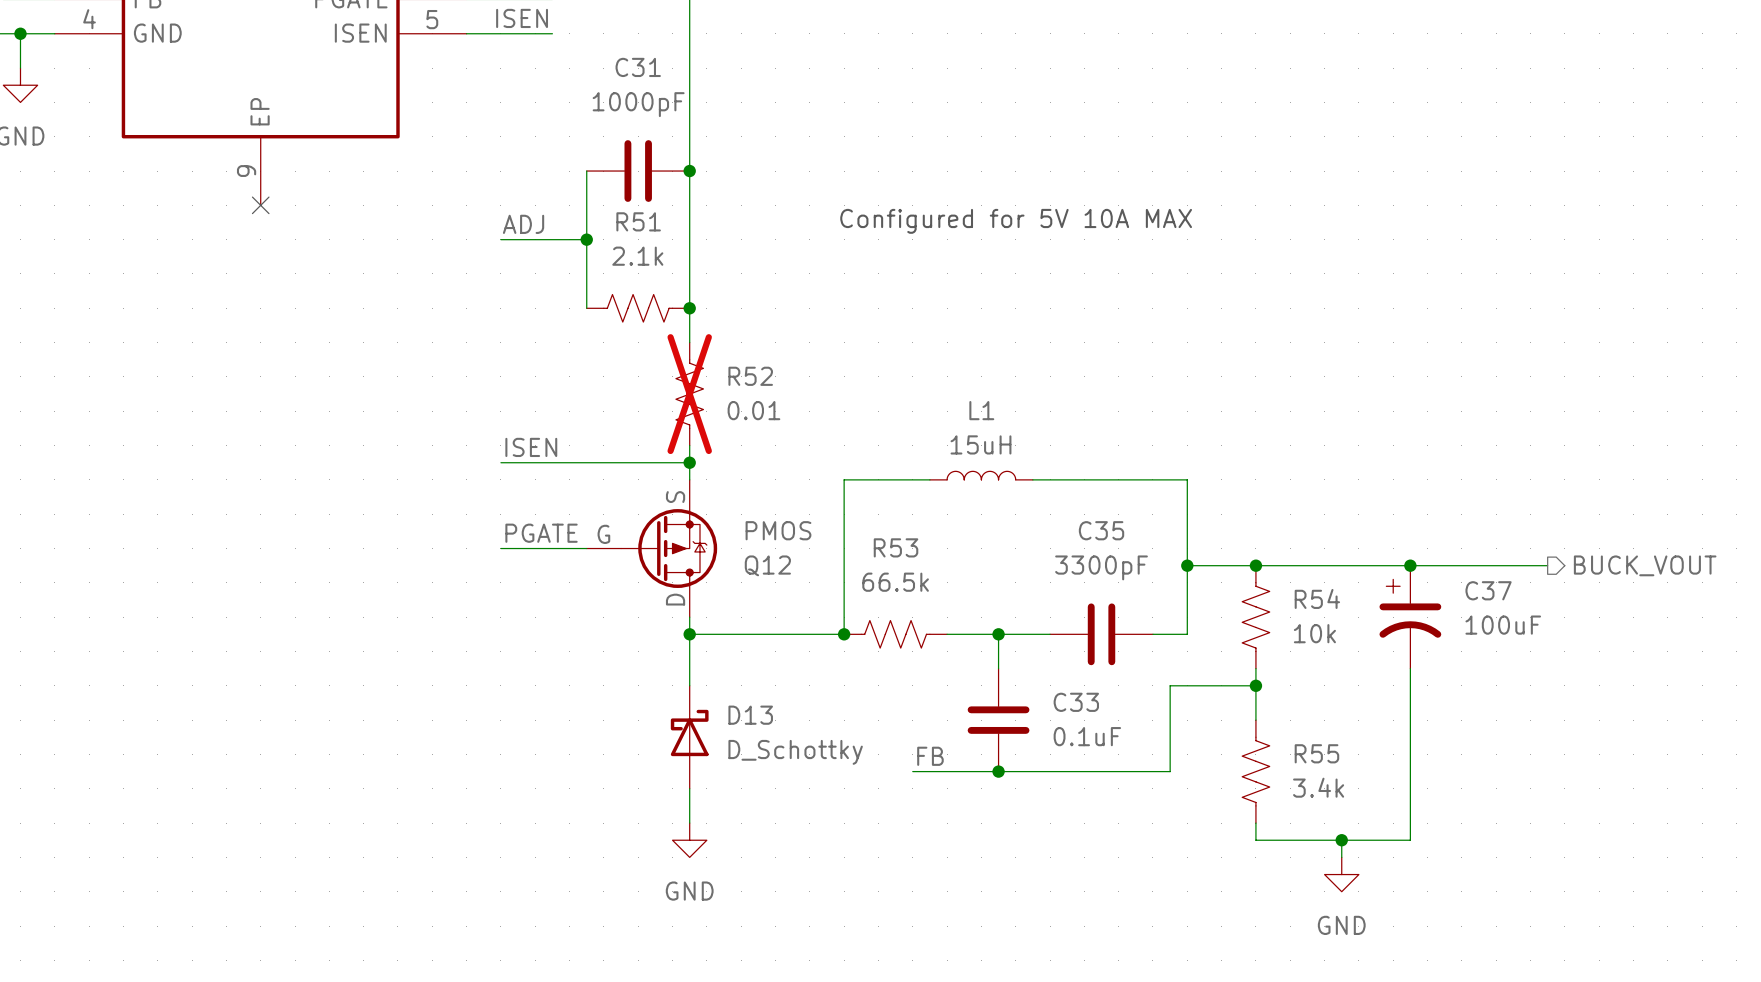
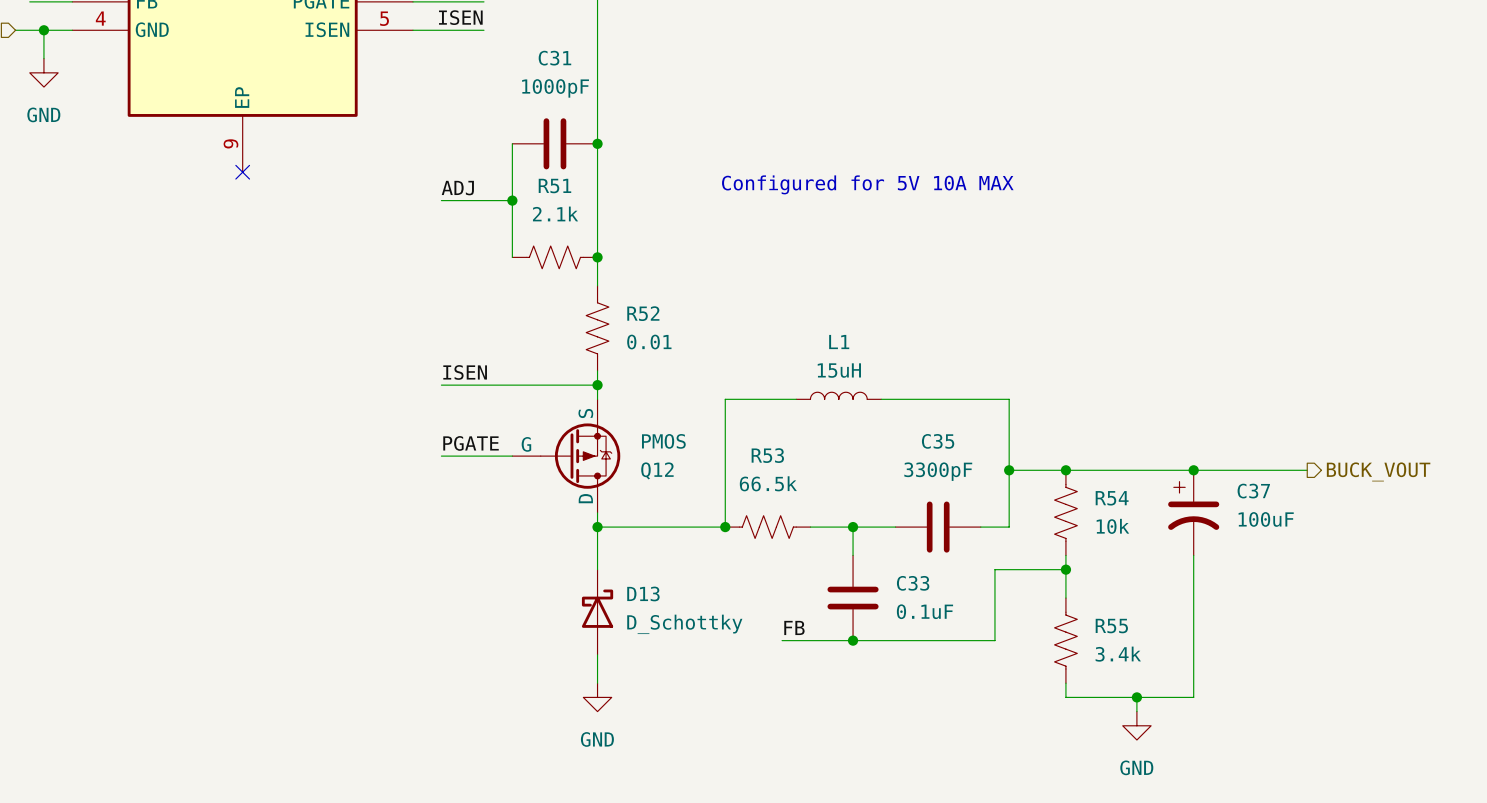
R52 do-not-place cross: (689, 394) -> none

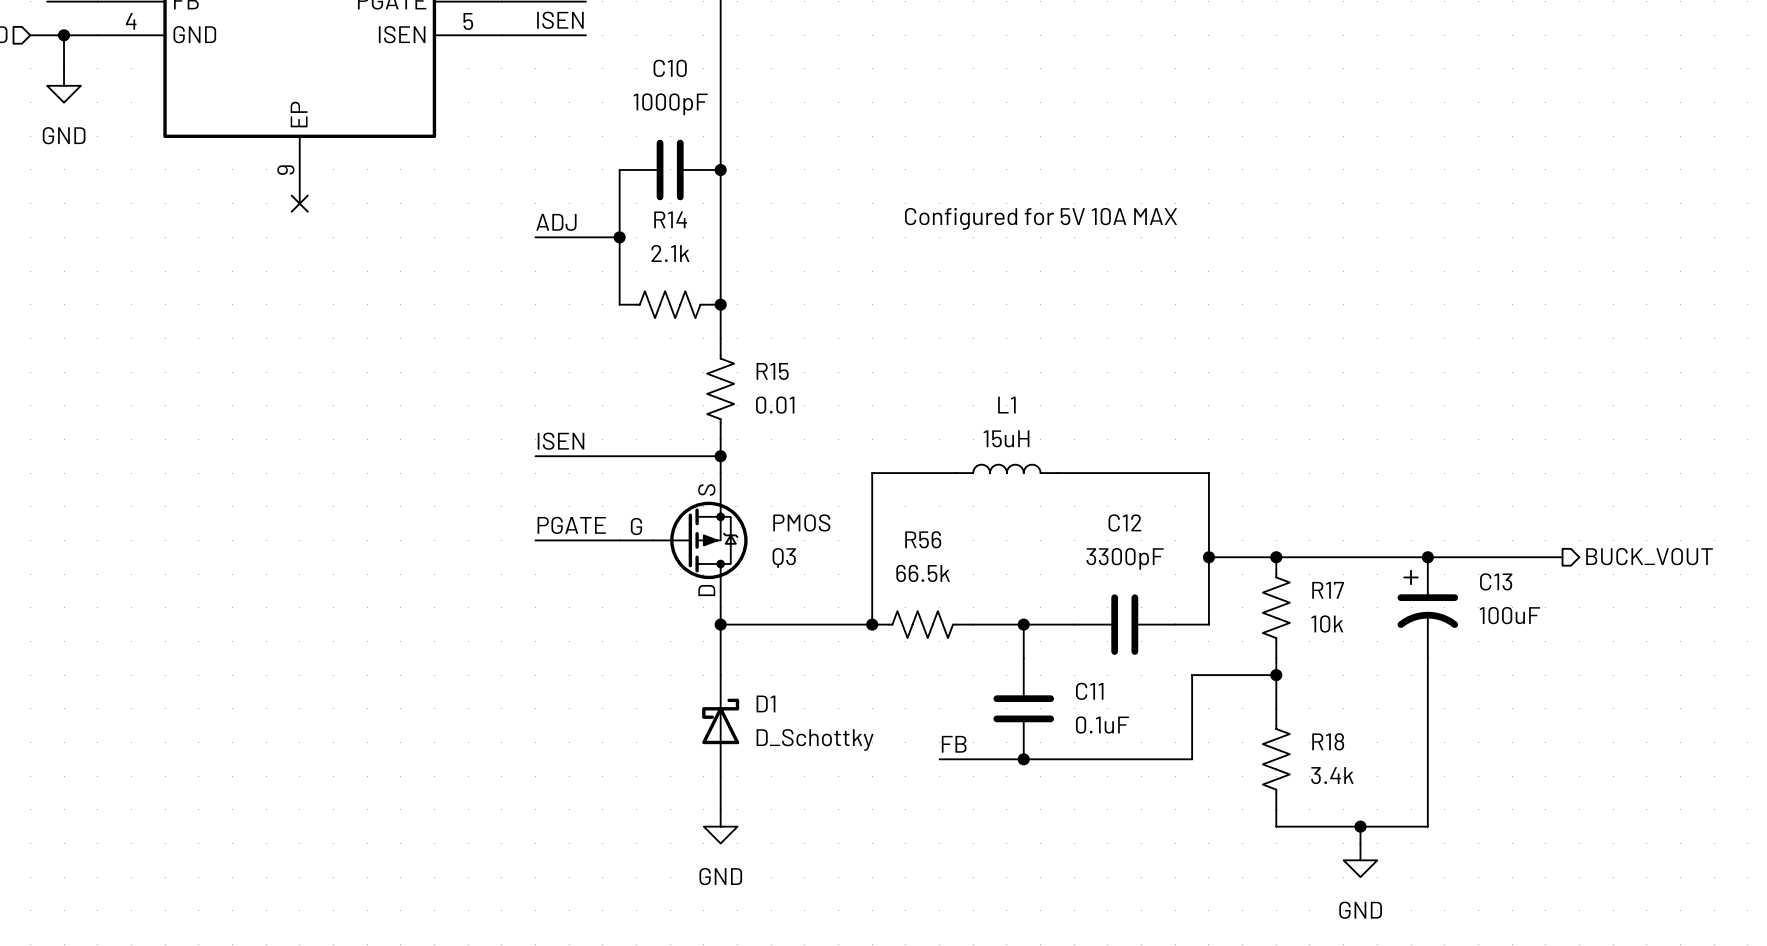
C31 name: C31 (554, 58) -> C10 (670, 68)
R51 name: R51 (554, 186) -> R14 (670, 219)
R52 name: R52 (643, 313) -> R15 (772, 371)
C35 name: C35 (938, 441) -> C12 (1124, 522)
R53 name: R53 (767, 455) -> R56 (923, 539)
Q12 name: Q12 (657, 470) -> Q3 (784, 557)
C37 name: C37 (1253, 491) -> C13 (1496, 581)
R54 name: R54 (1112, 498) -> R17 (1328, 590)
C33 name: C33 (913, 583) -> C11 (1089, 691)
D13 name: D13 (643, 593) -> D1 (766, 703)
R55 name: R55 (1111, 626) -> R18 (1328, 741)

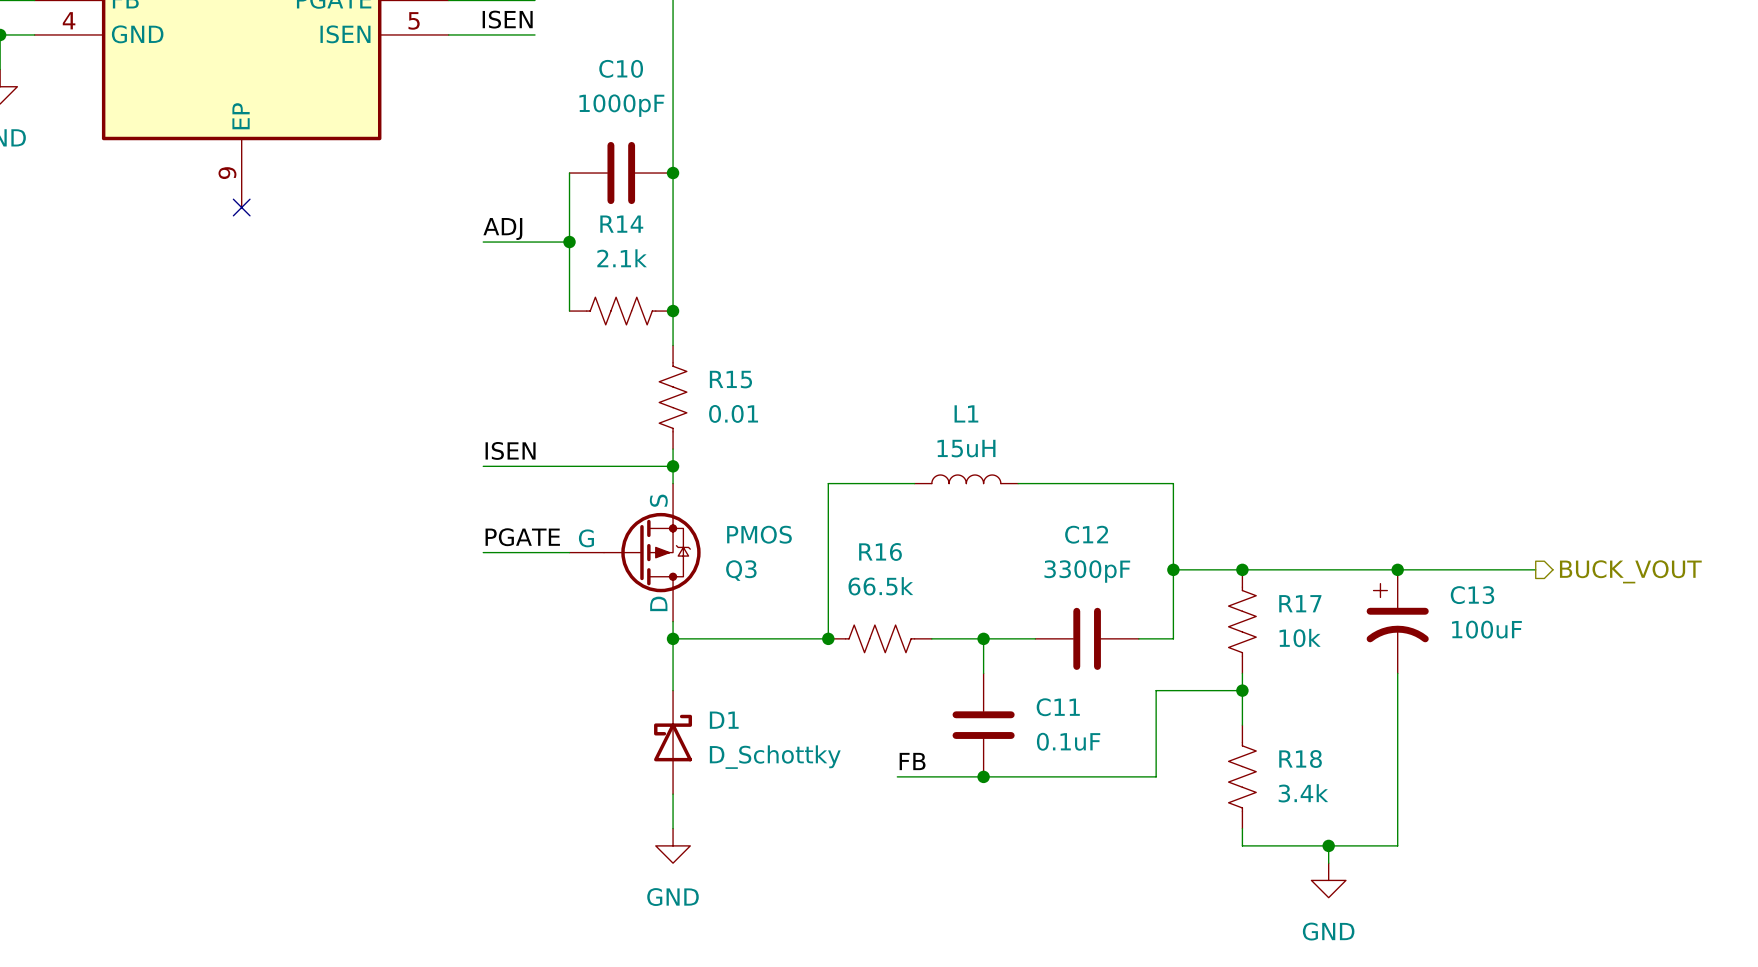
text: Configured for 5V 10A MAX (1040, 218) -> none
R56 name: R56 (923, 539) -> R16 (880, 551)

